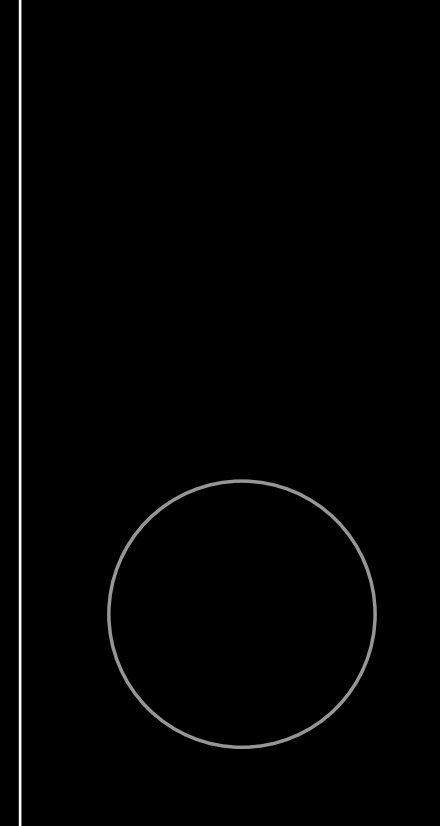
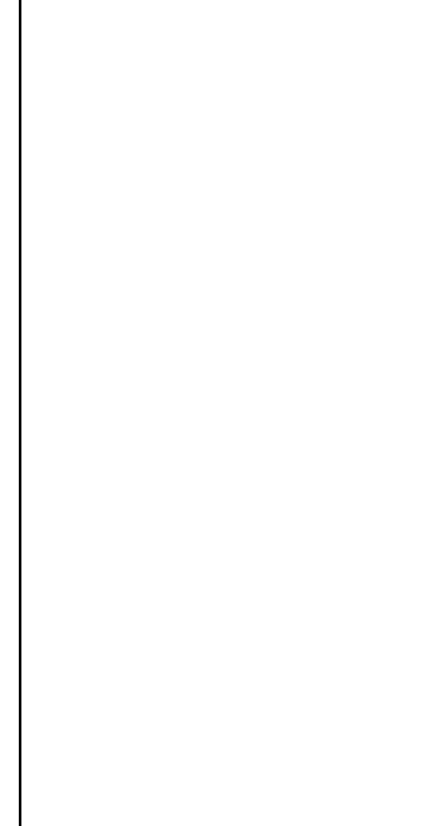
drawing: [107, 479, 377, 750] -> none

